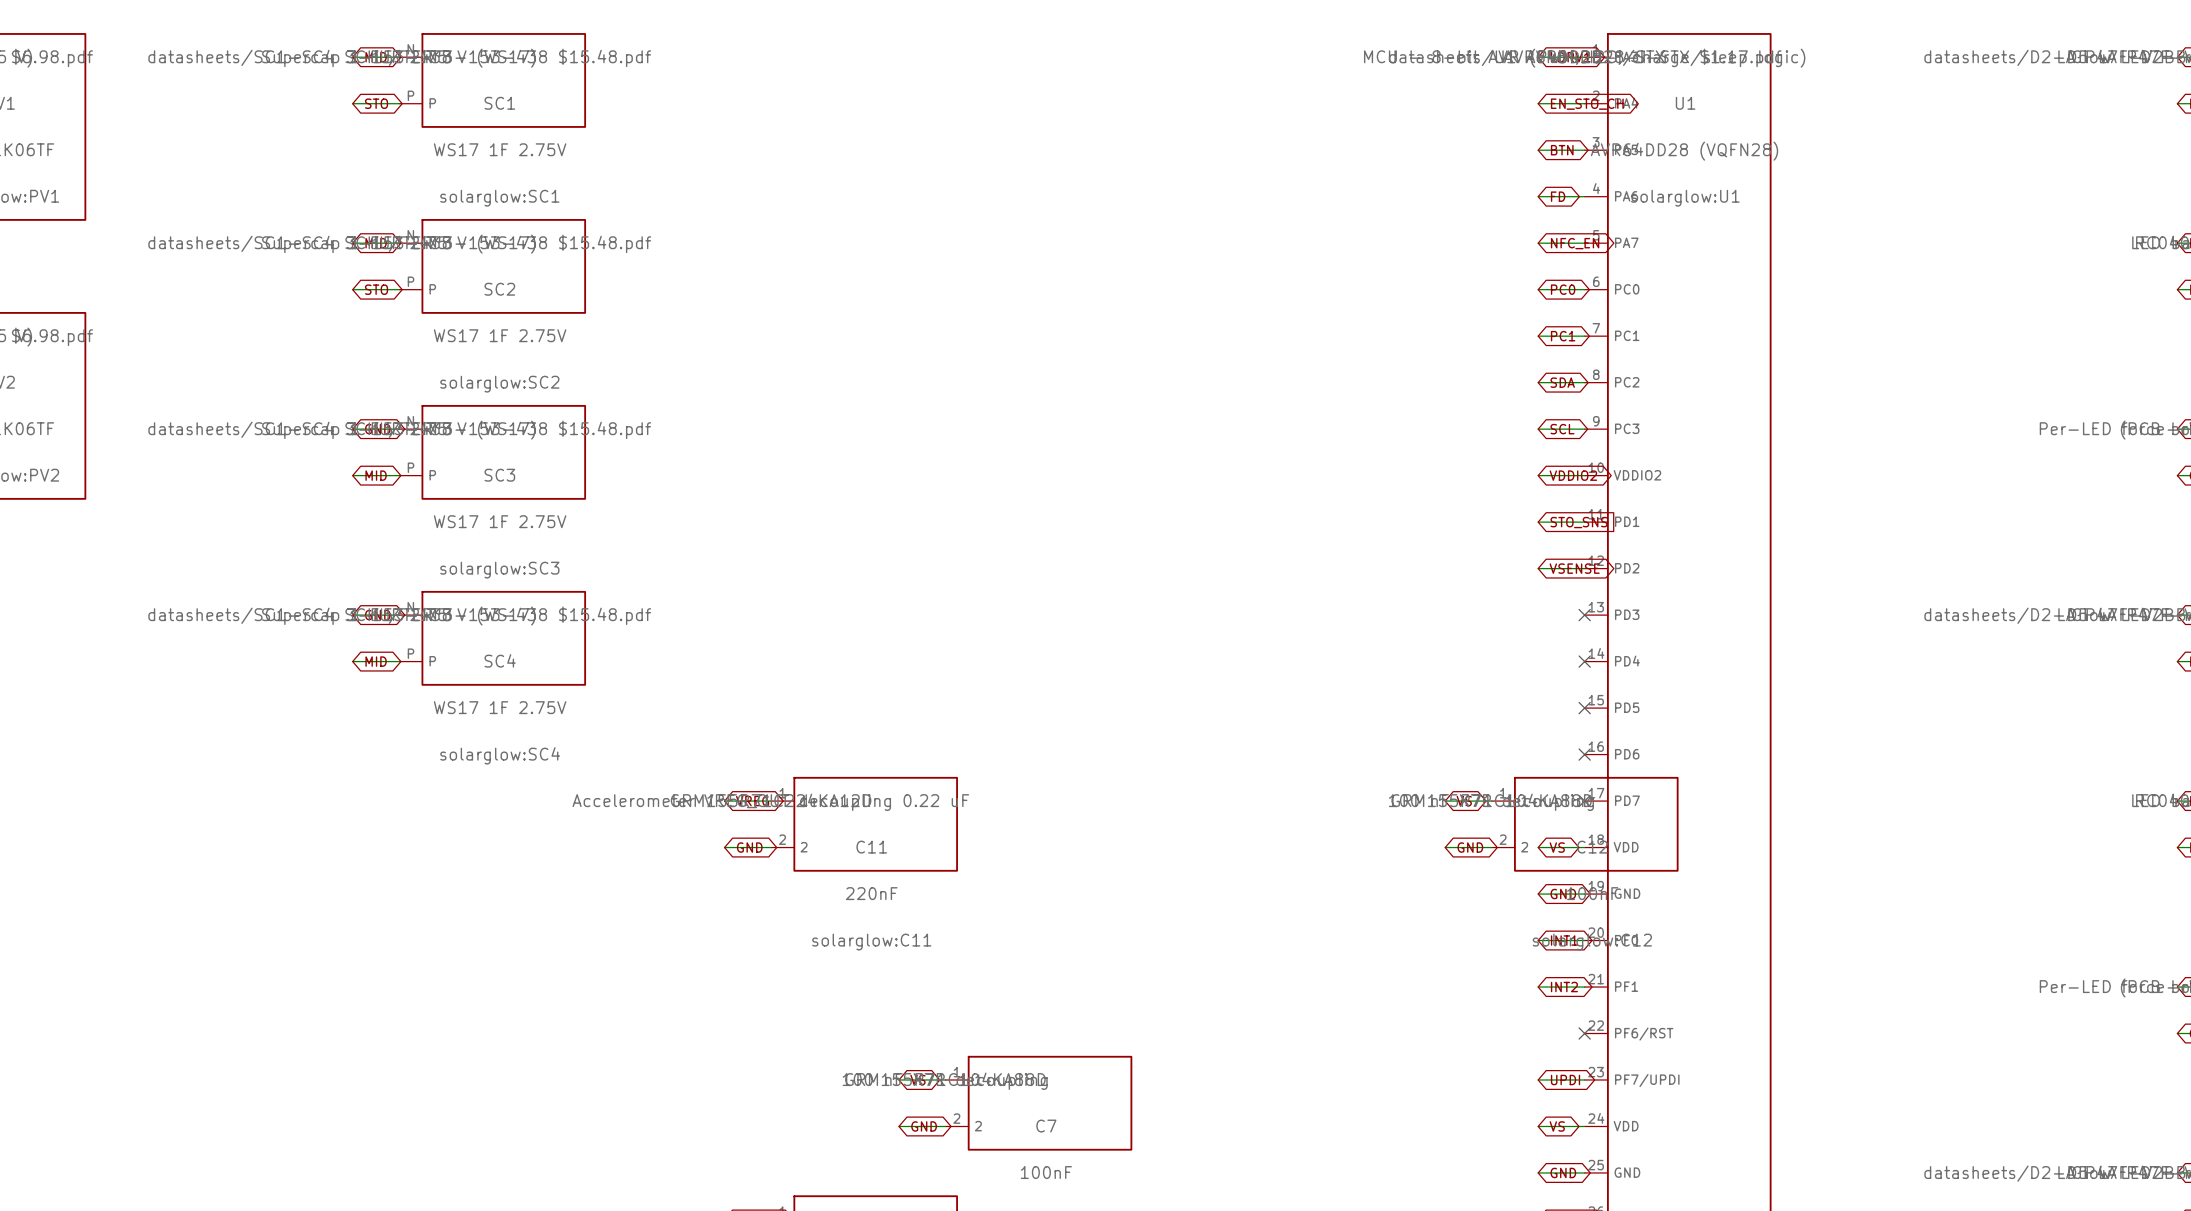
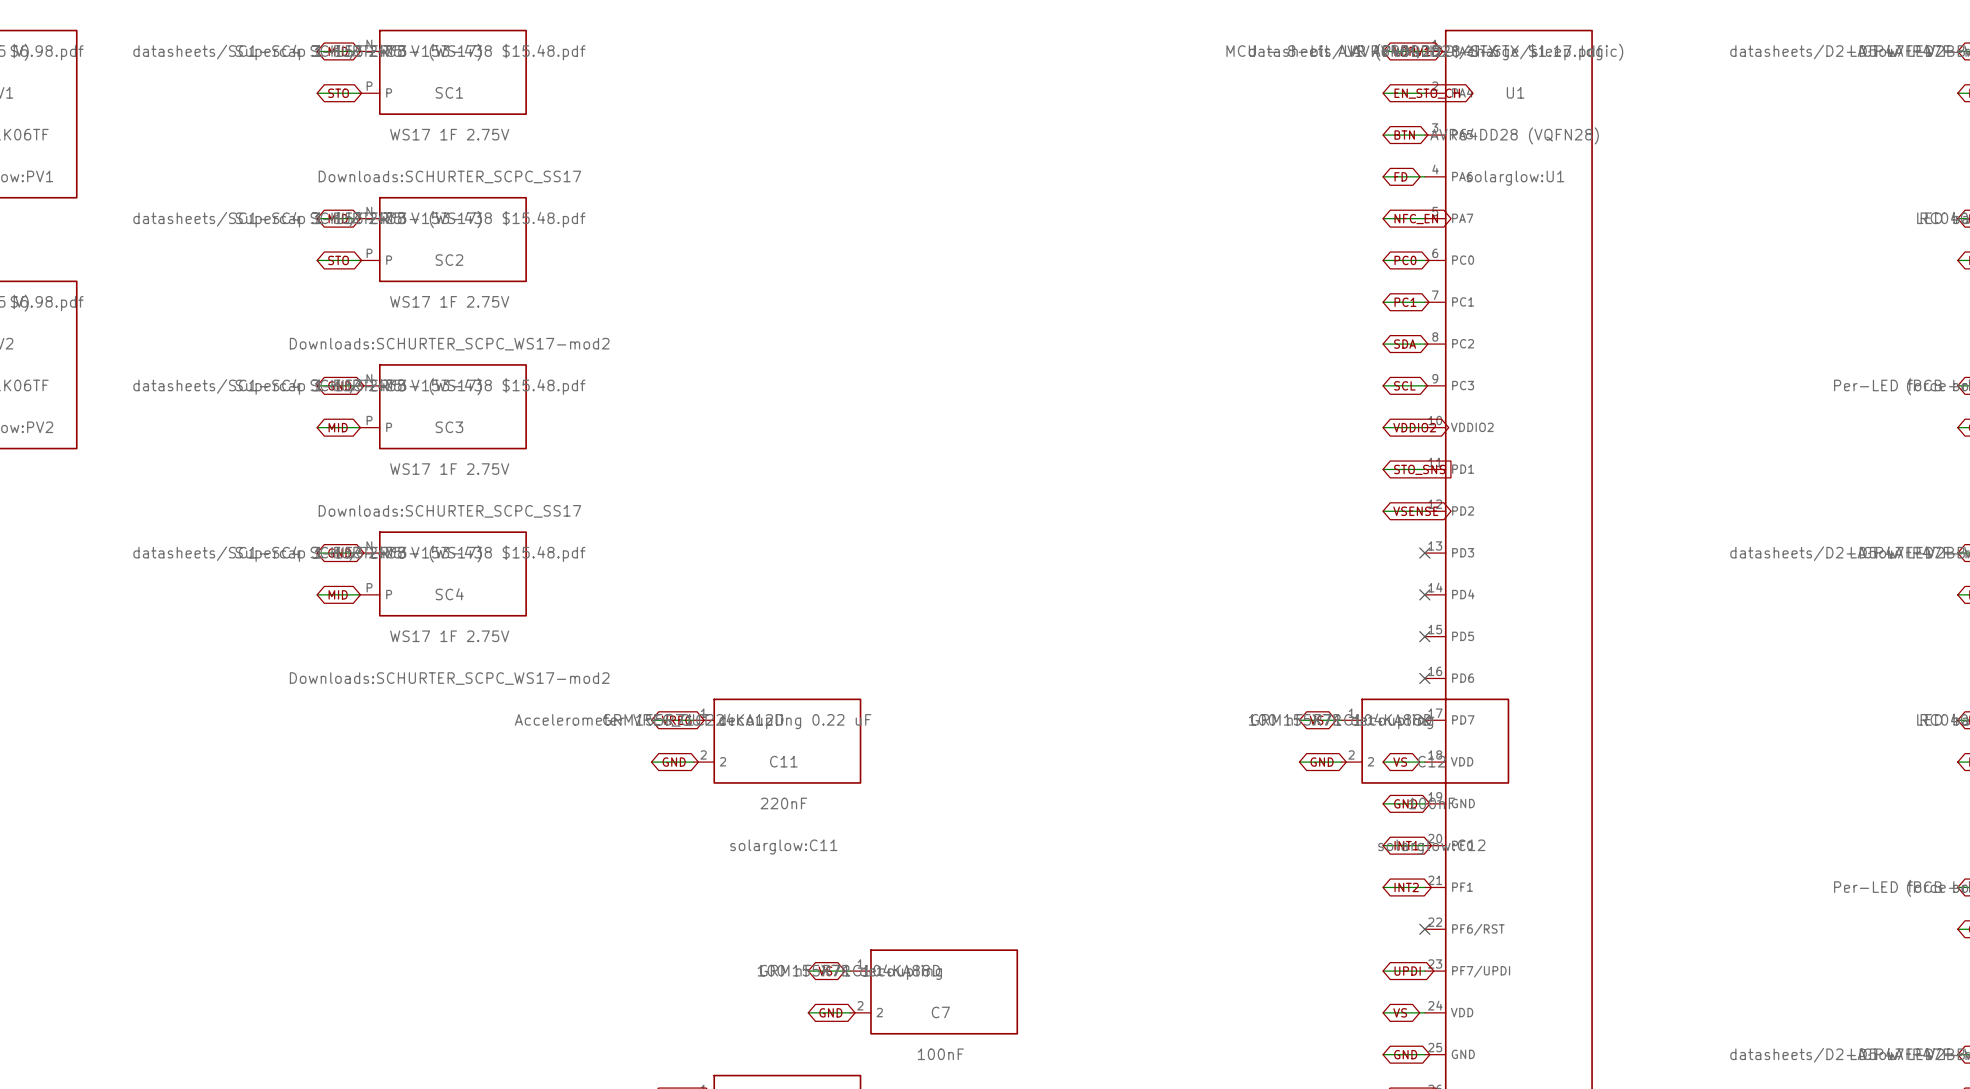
SC1 text: solarglow:SC1 (499, 198) -> Downloads:SCHURTER_SCPC_SS17 (449, 176)
SC2 text: solarglow:SC2 (499, 384) -> Downloads:SCHURTER_SCPC_WS17-mod2 (449, 344)
SC3 text: solarglow:SC3 (499, 570) -> Downloads:SCHURTER_SCPC_SS17 (449, 511)
SC4 text: solarglow:SC4 (500, 755) -> Downloads:SCHURTER_SCPC_WS17-mod2 (449, 678)

